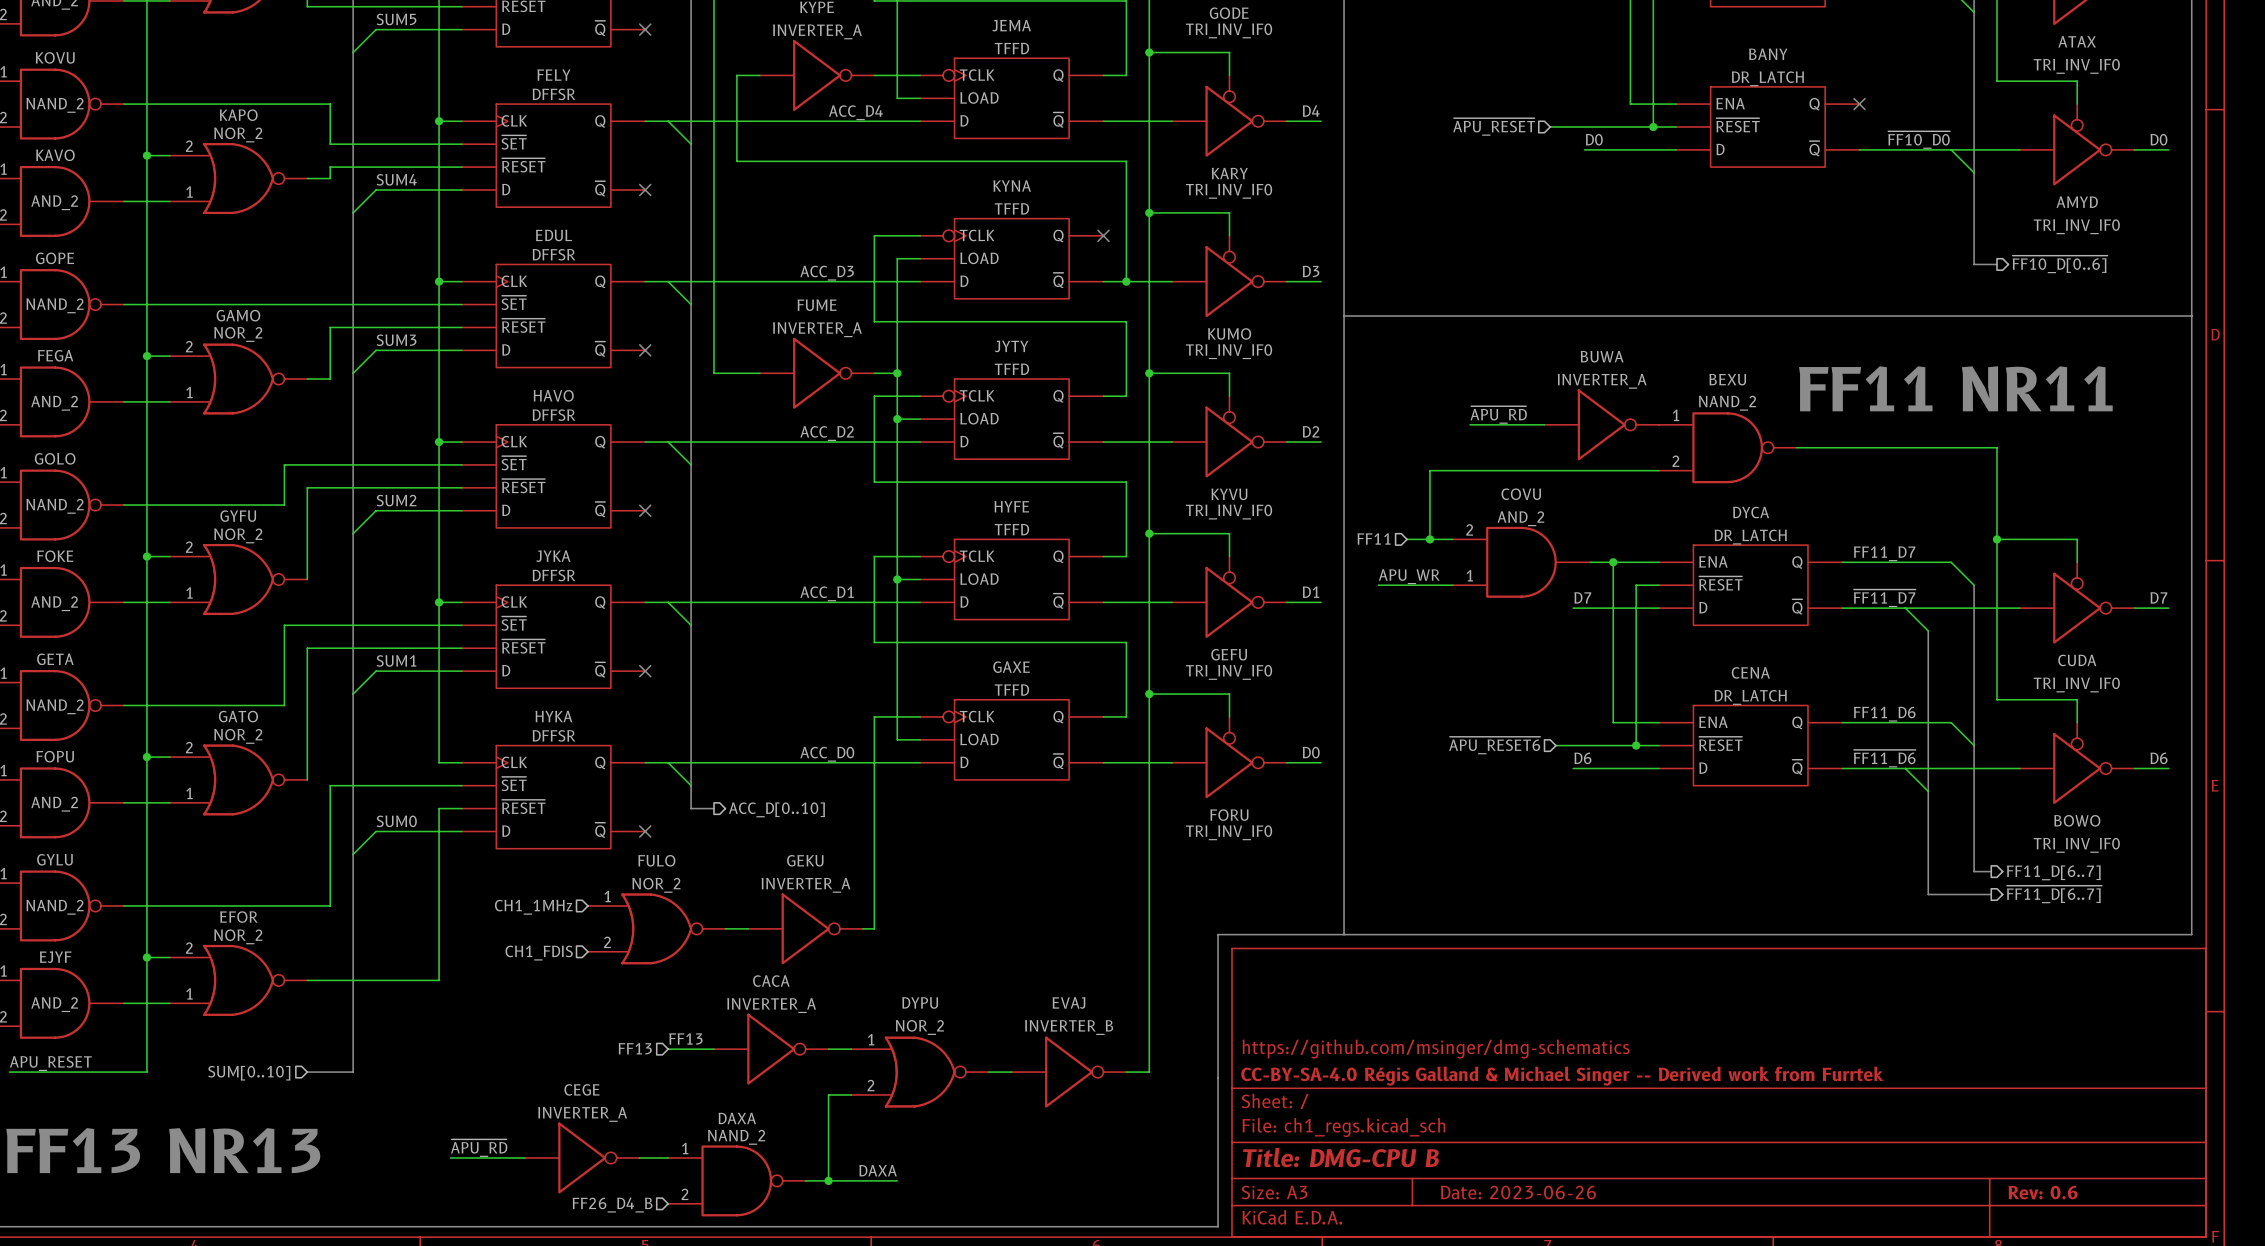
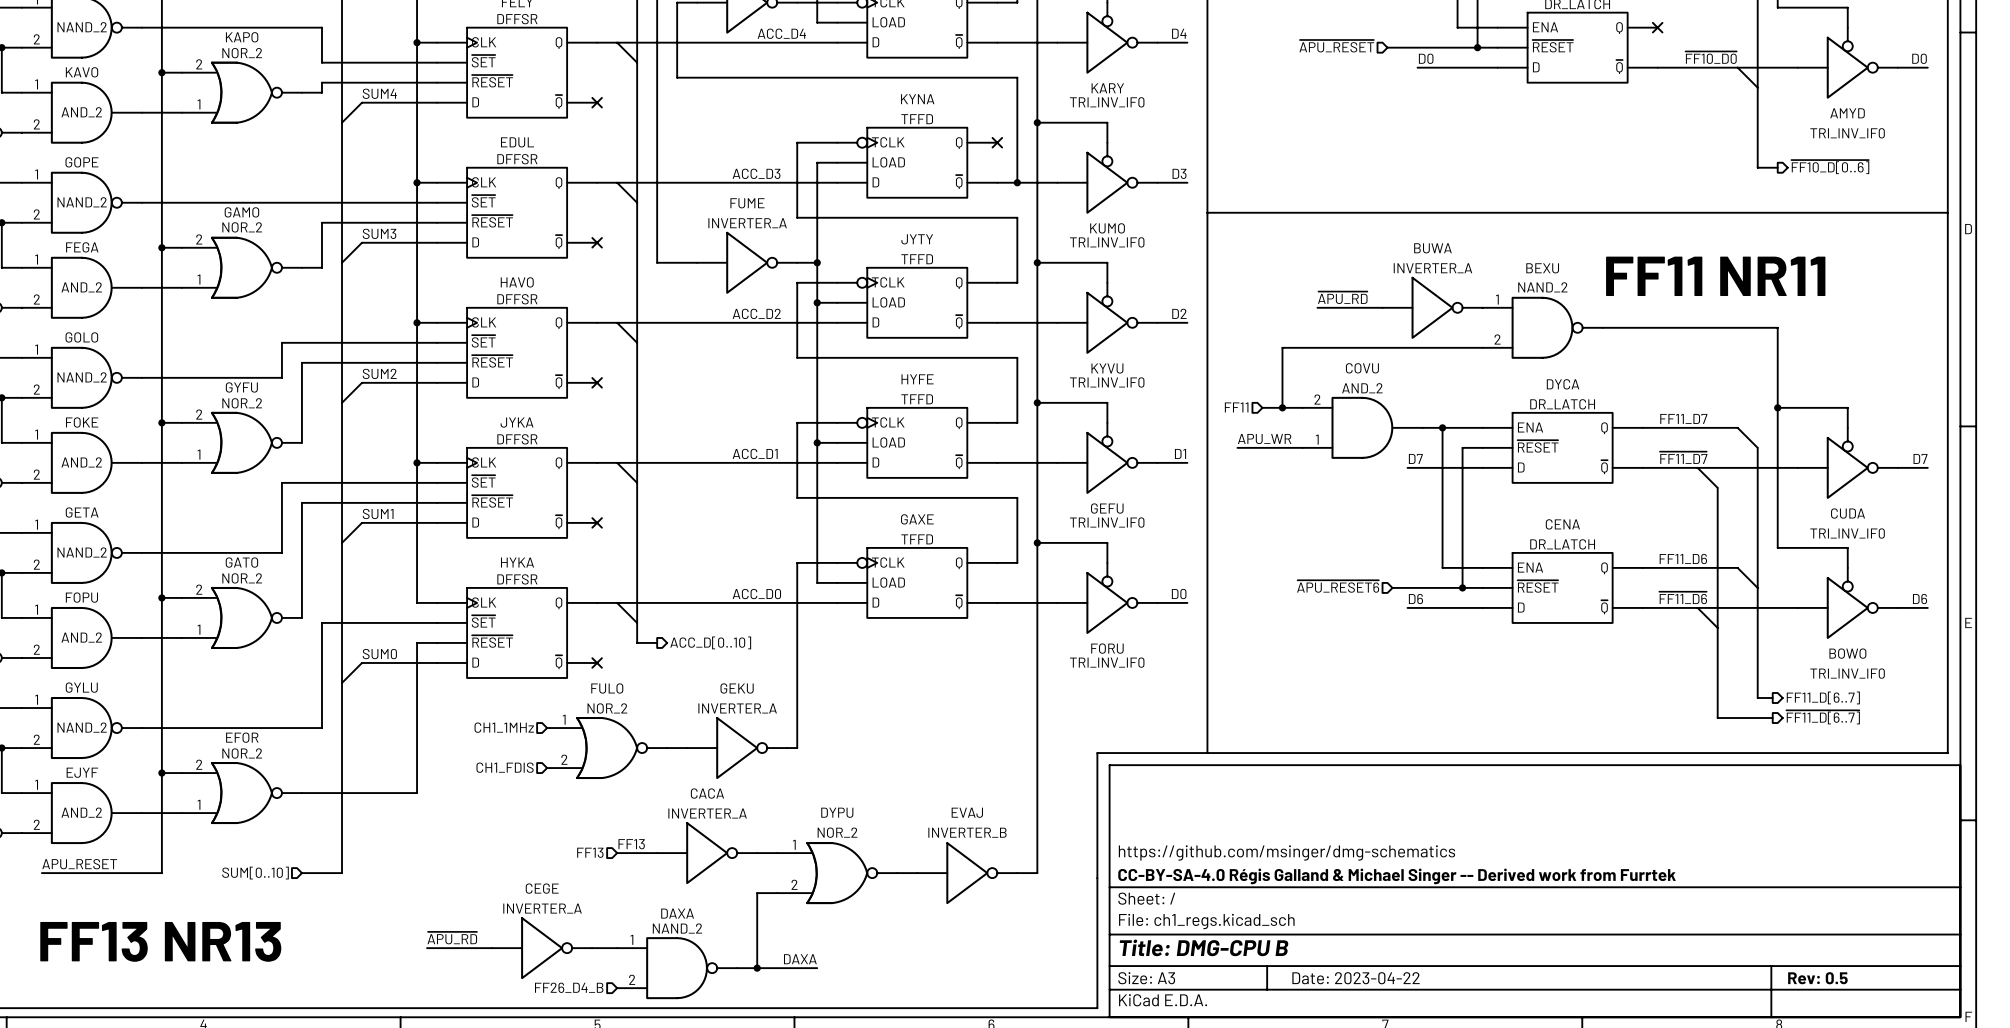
title block: Date: 2023-06-26 (1518, 1192) -> Date: 2023-04-22 (1356, 978)
title block: Rev: 0.6 (2043, 1192) -> Rev: 0.5 (1817, 978)

